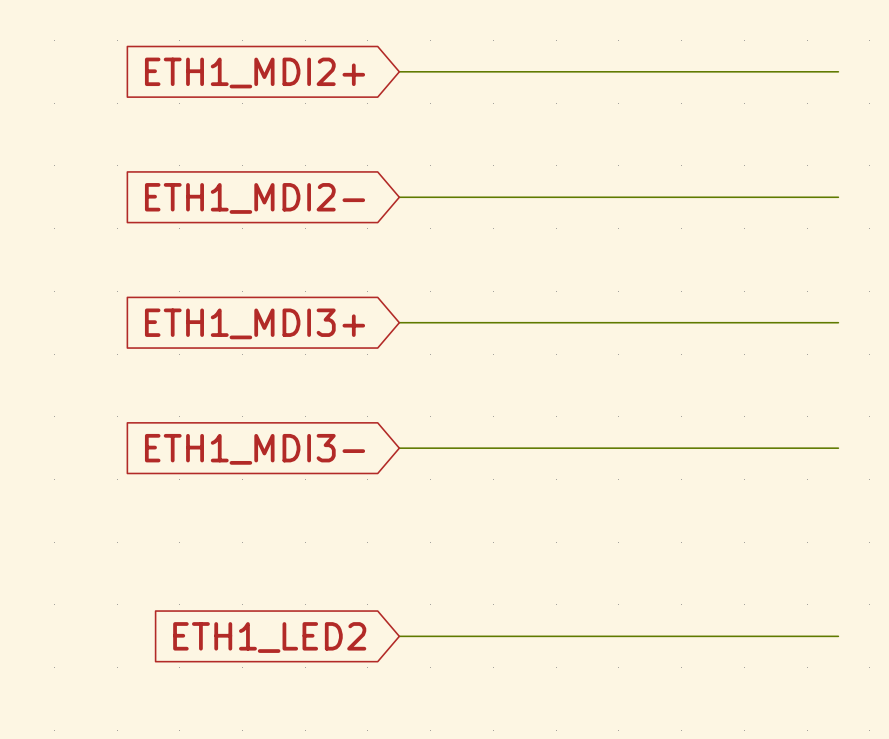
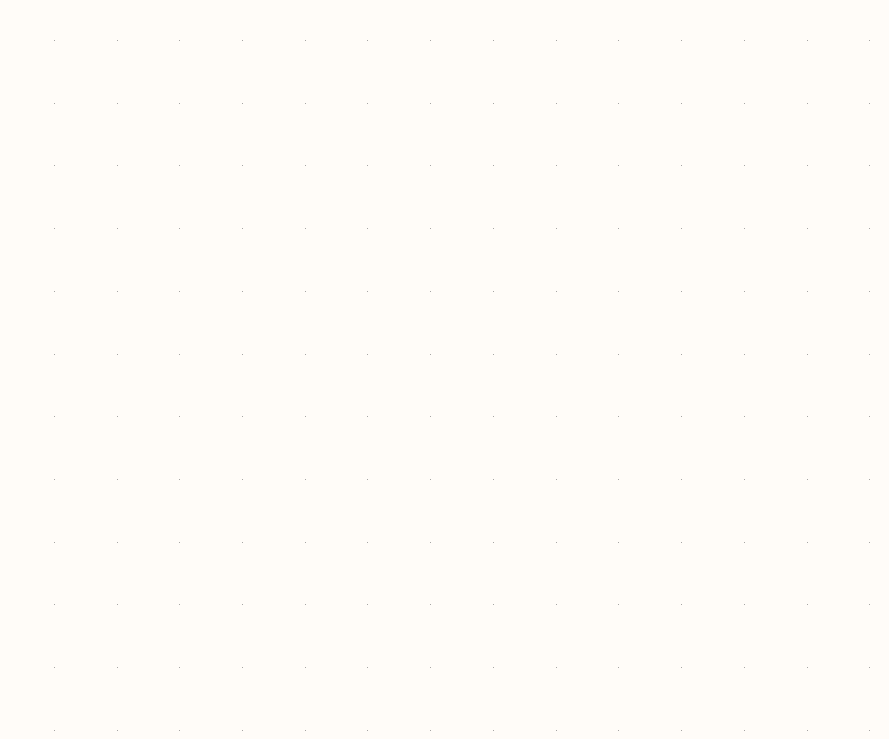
wire: (399, 71) (838, 71) -> none
global label: ETH1_MDI2+ (255, 72) -> none
wire: (399, 197) (838, 197) -> none
global label: ETH1_MDI2- (255, 198) -> none
wire: (399, 322) (838, 322) -> none
global label: ETH1_MDI3+ (255, 323) -> none
wire: (399, 448) (838, 448) -> none
global label: ETH1_MDI3- (255, 449) -> none
wire: (399, 636) (838, 636) -> none
global label: ETH1_LED2 (269, 637) -> none

